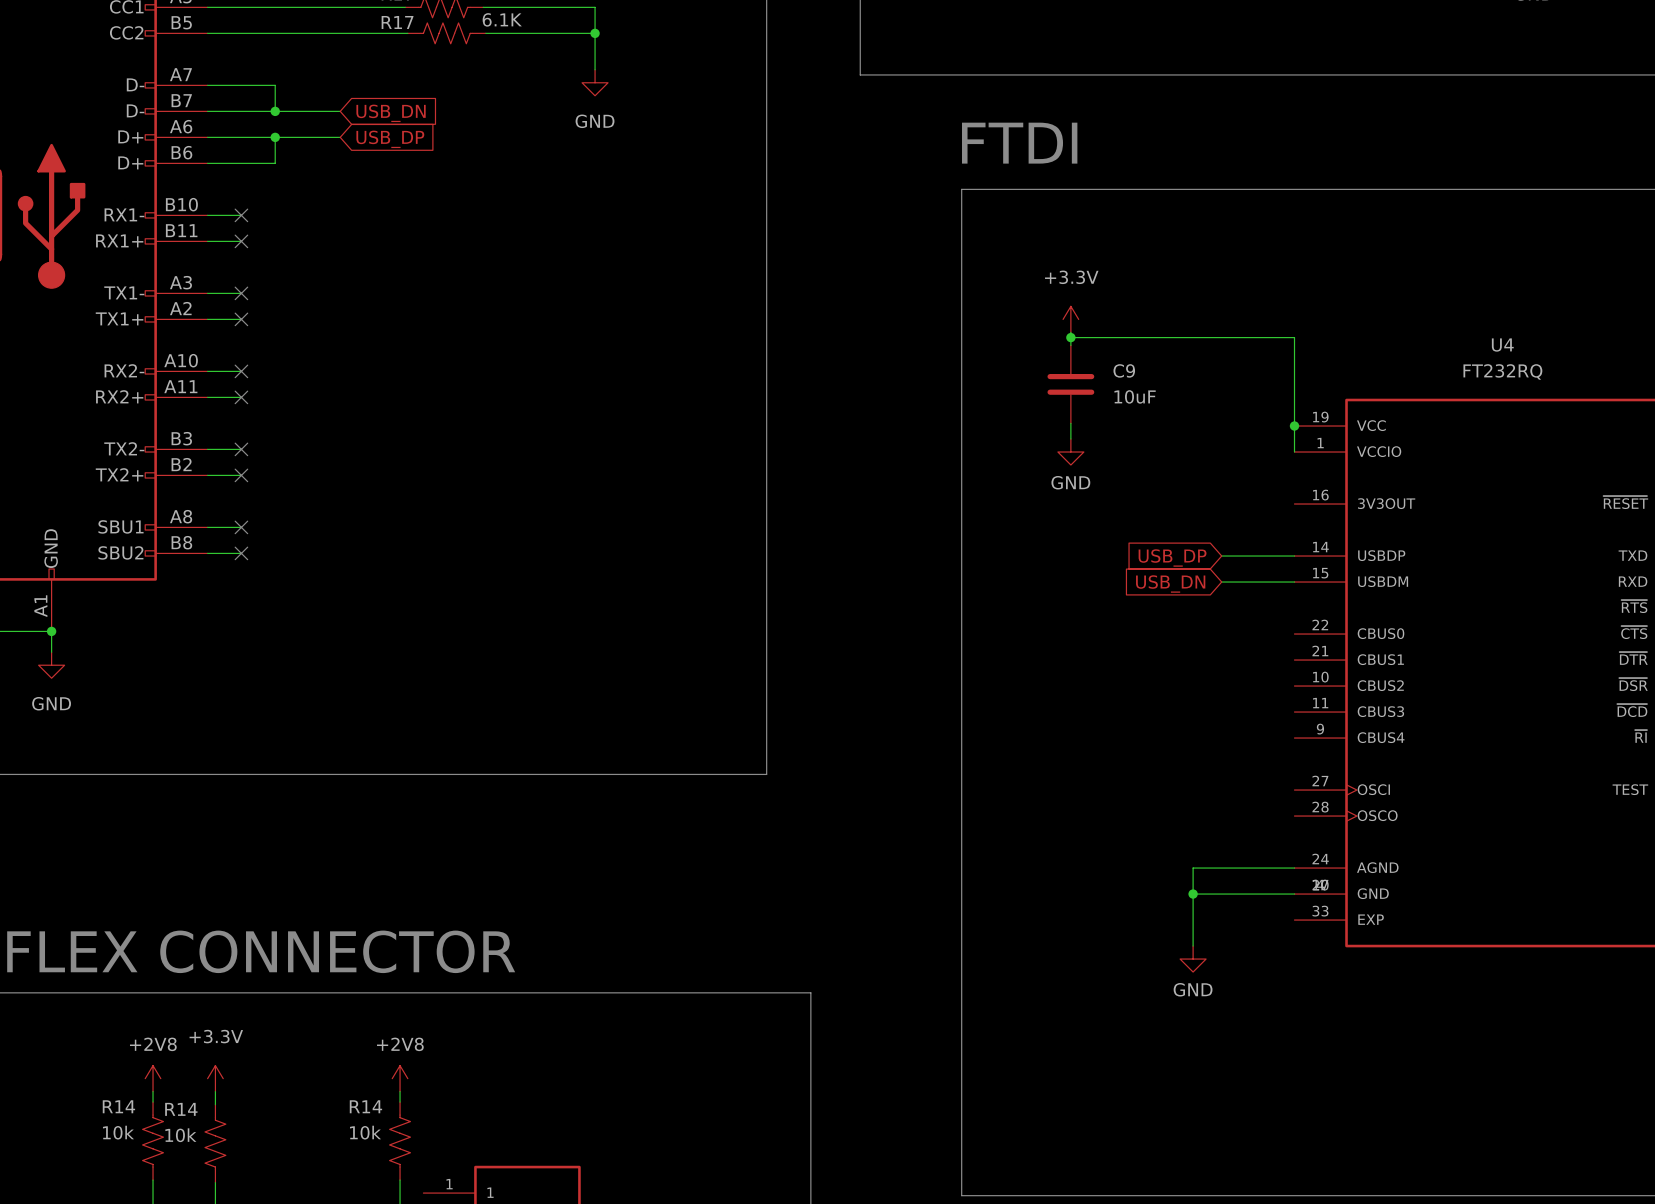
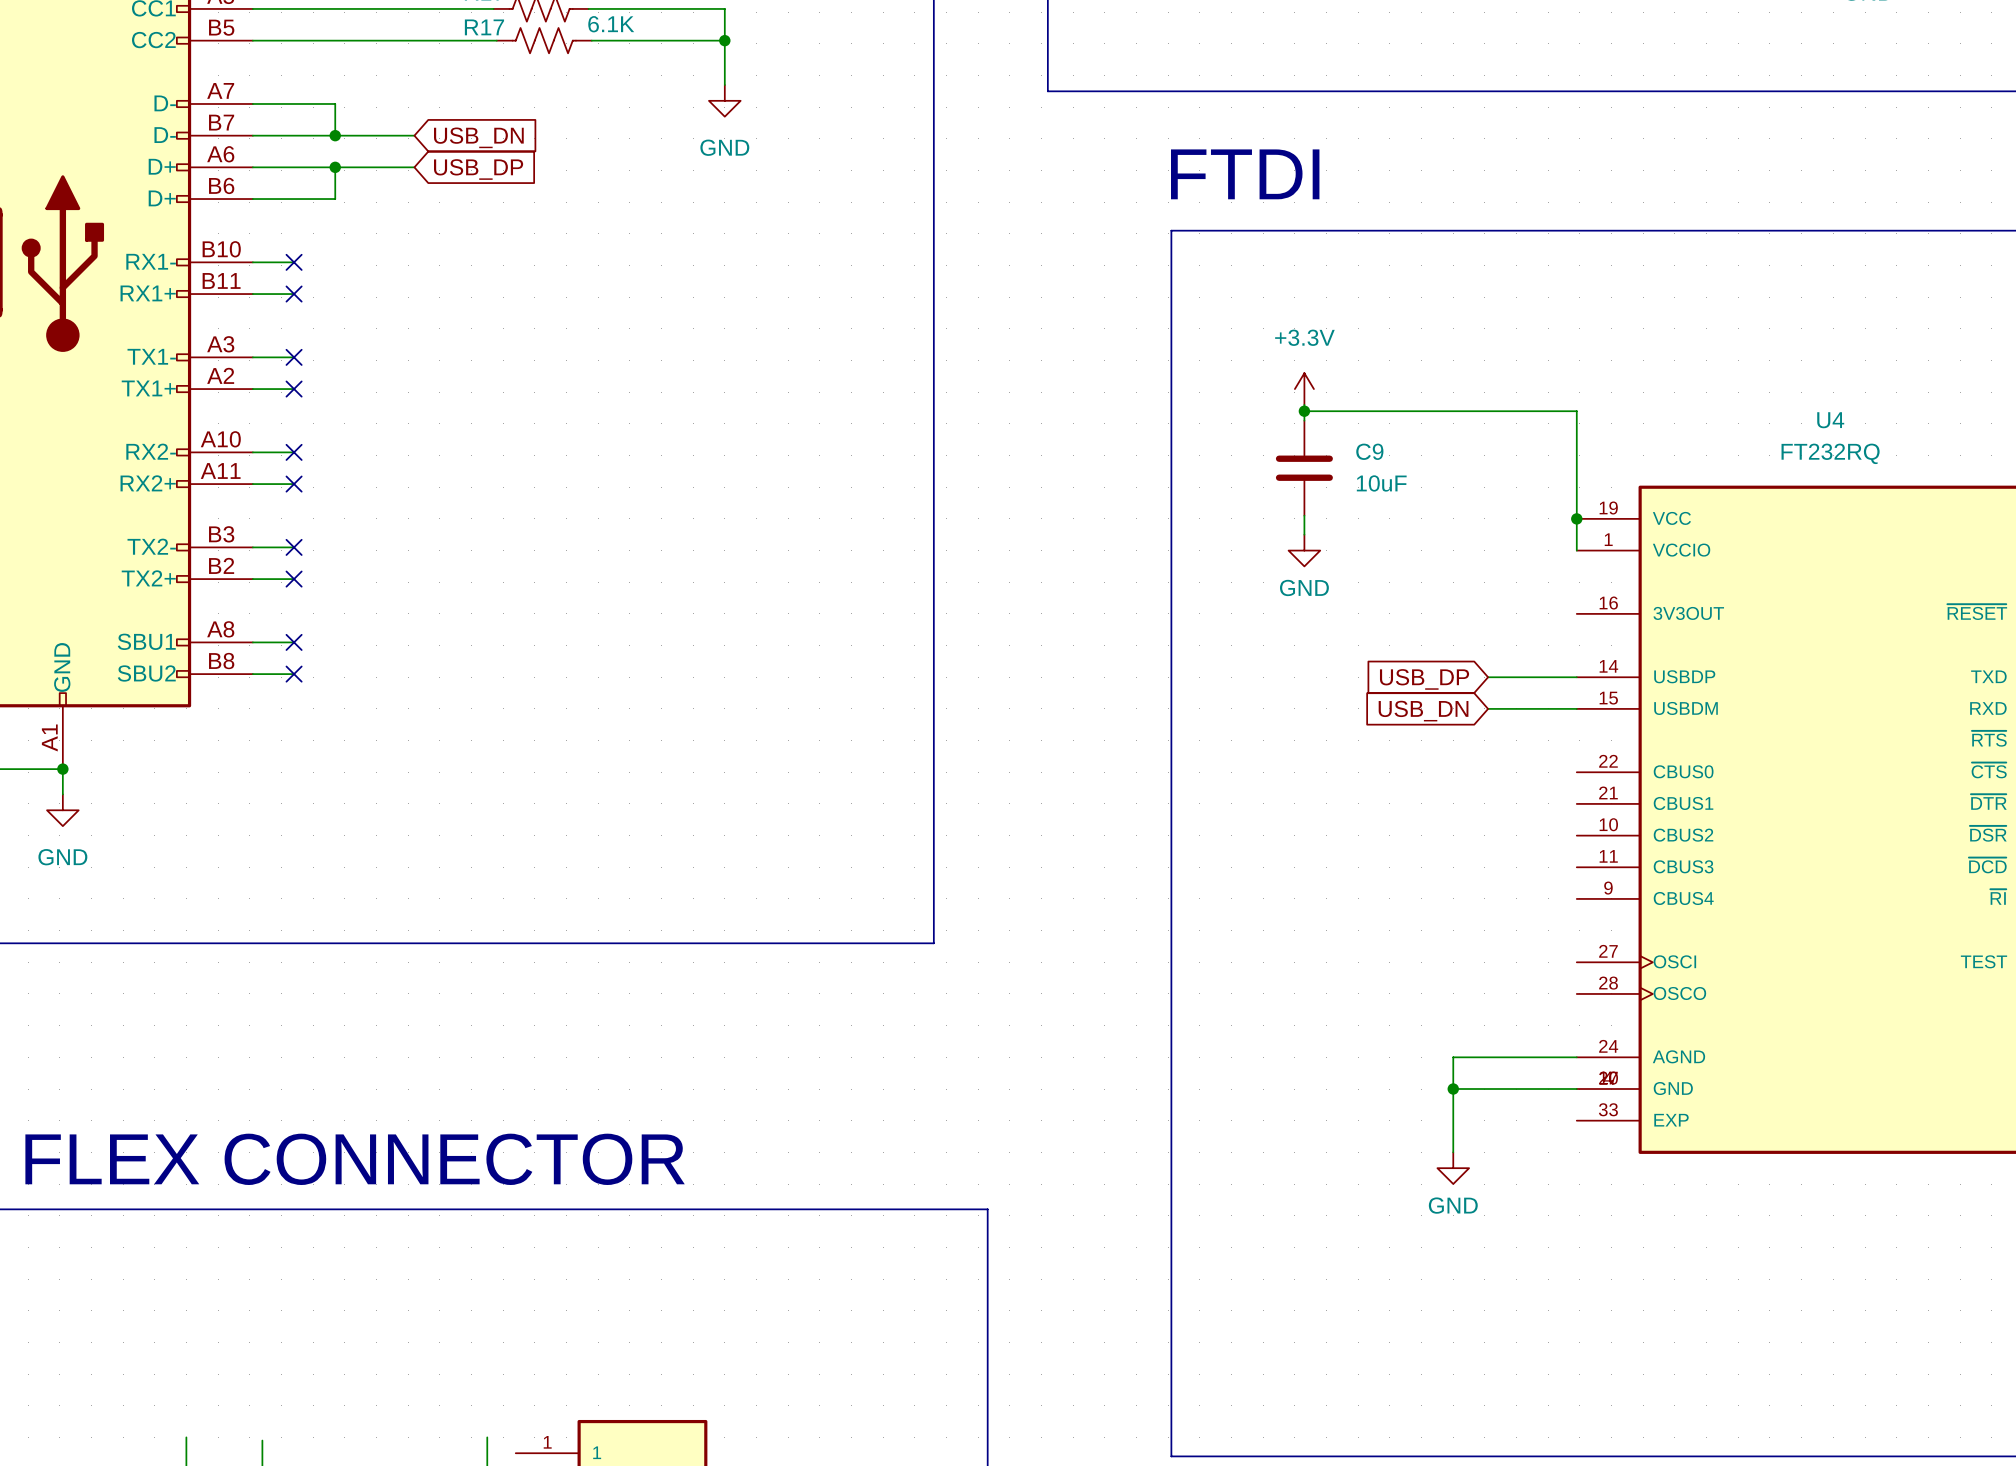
power symbol: +2V8 (153, 1078) -> none
power symbol: +3.3V (215, 1078) -> none
power symbol: +2V8 (400, 1078) -> none
wire: (153, 1091) (153, 1102) -> none
wire: (215, 1091) (215, 1104) -> none
wire: (400, 1091) (400, 1102) -> none
R14: 10k (153, 1141) -> none
R14: 10k (400, 1141) -> none
R14: 10k (215, 1143) -> none

